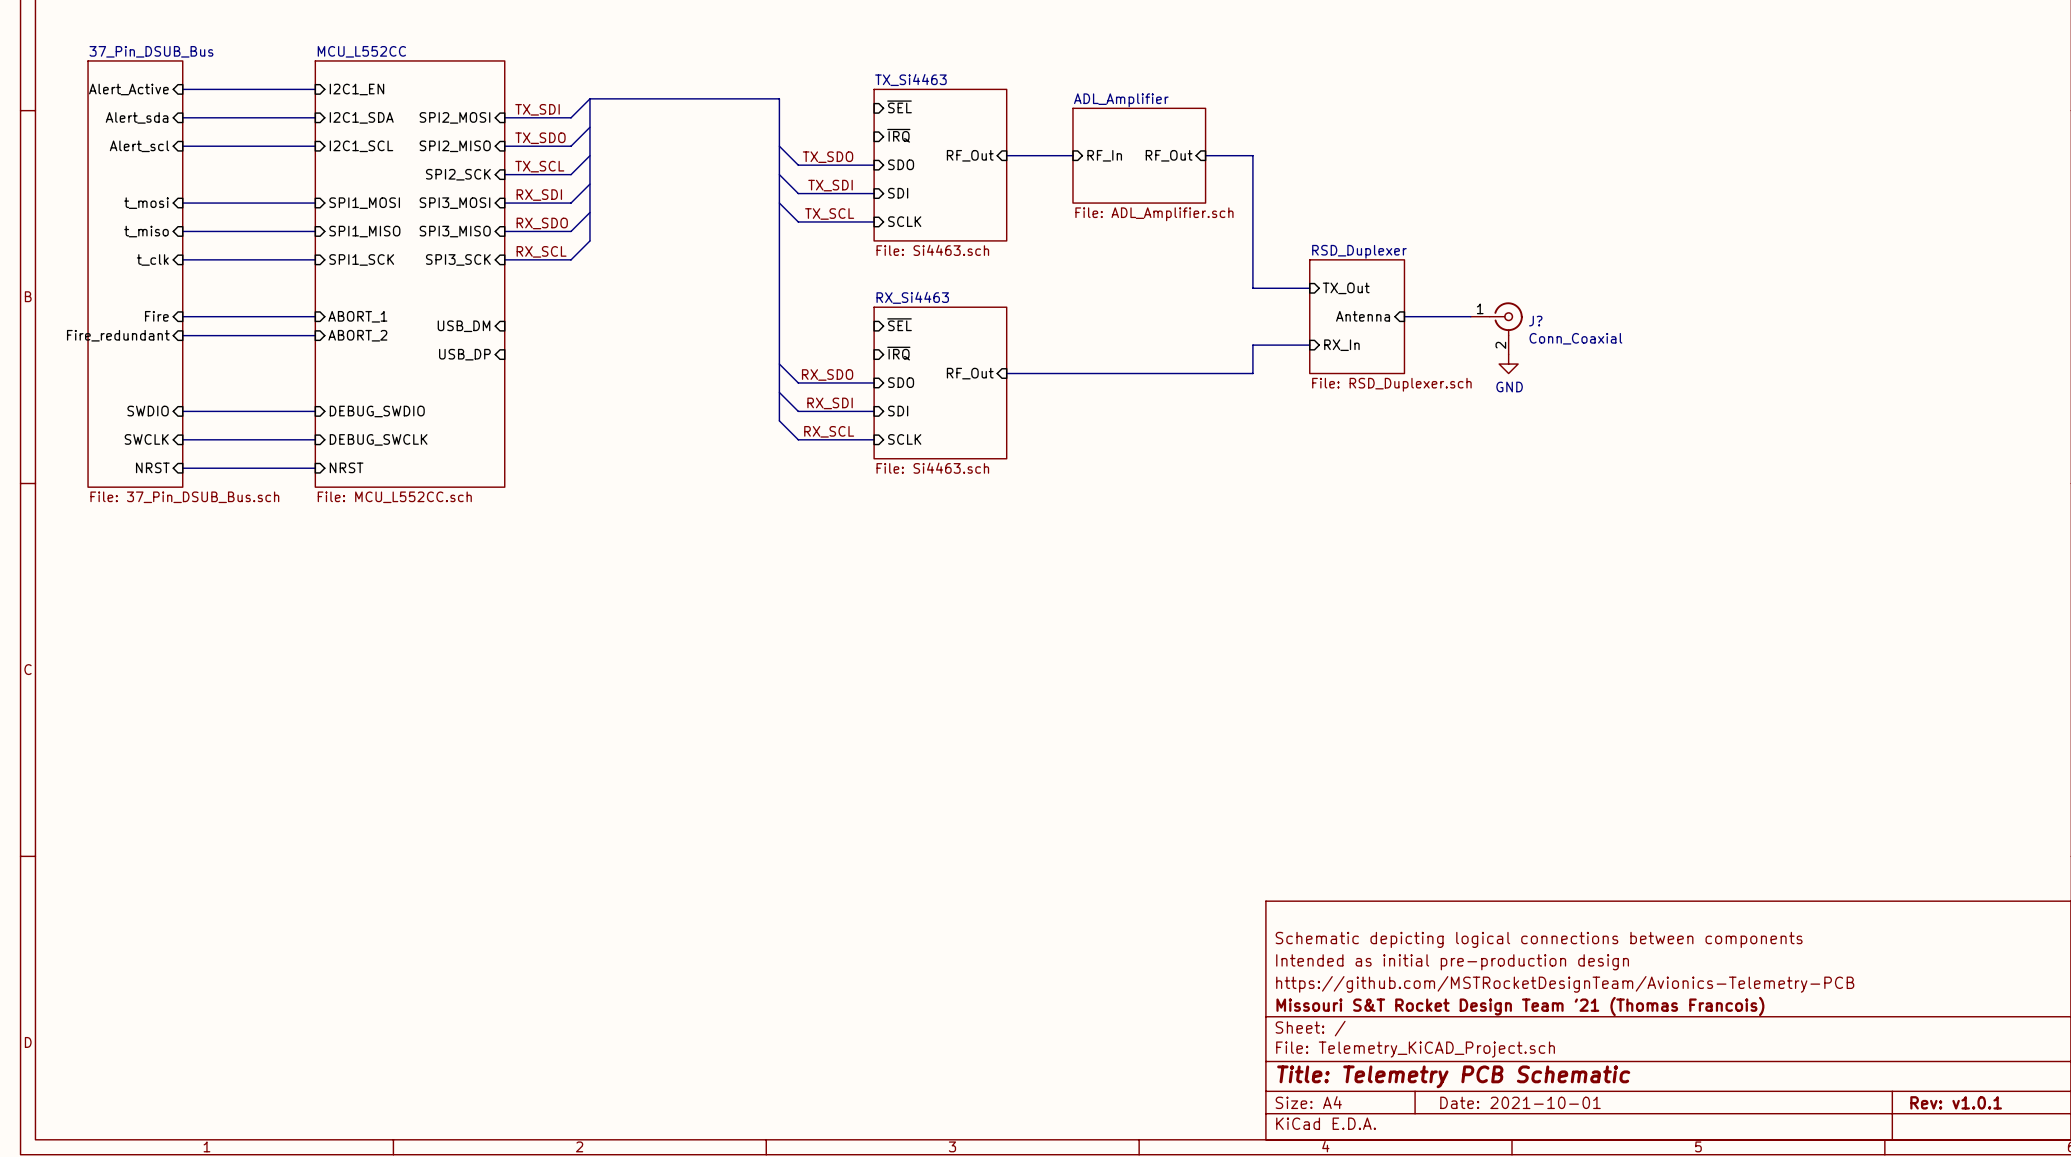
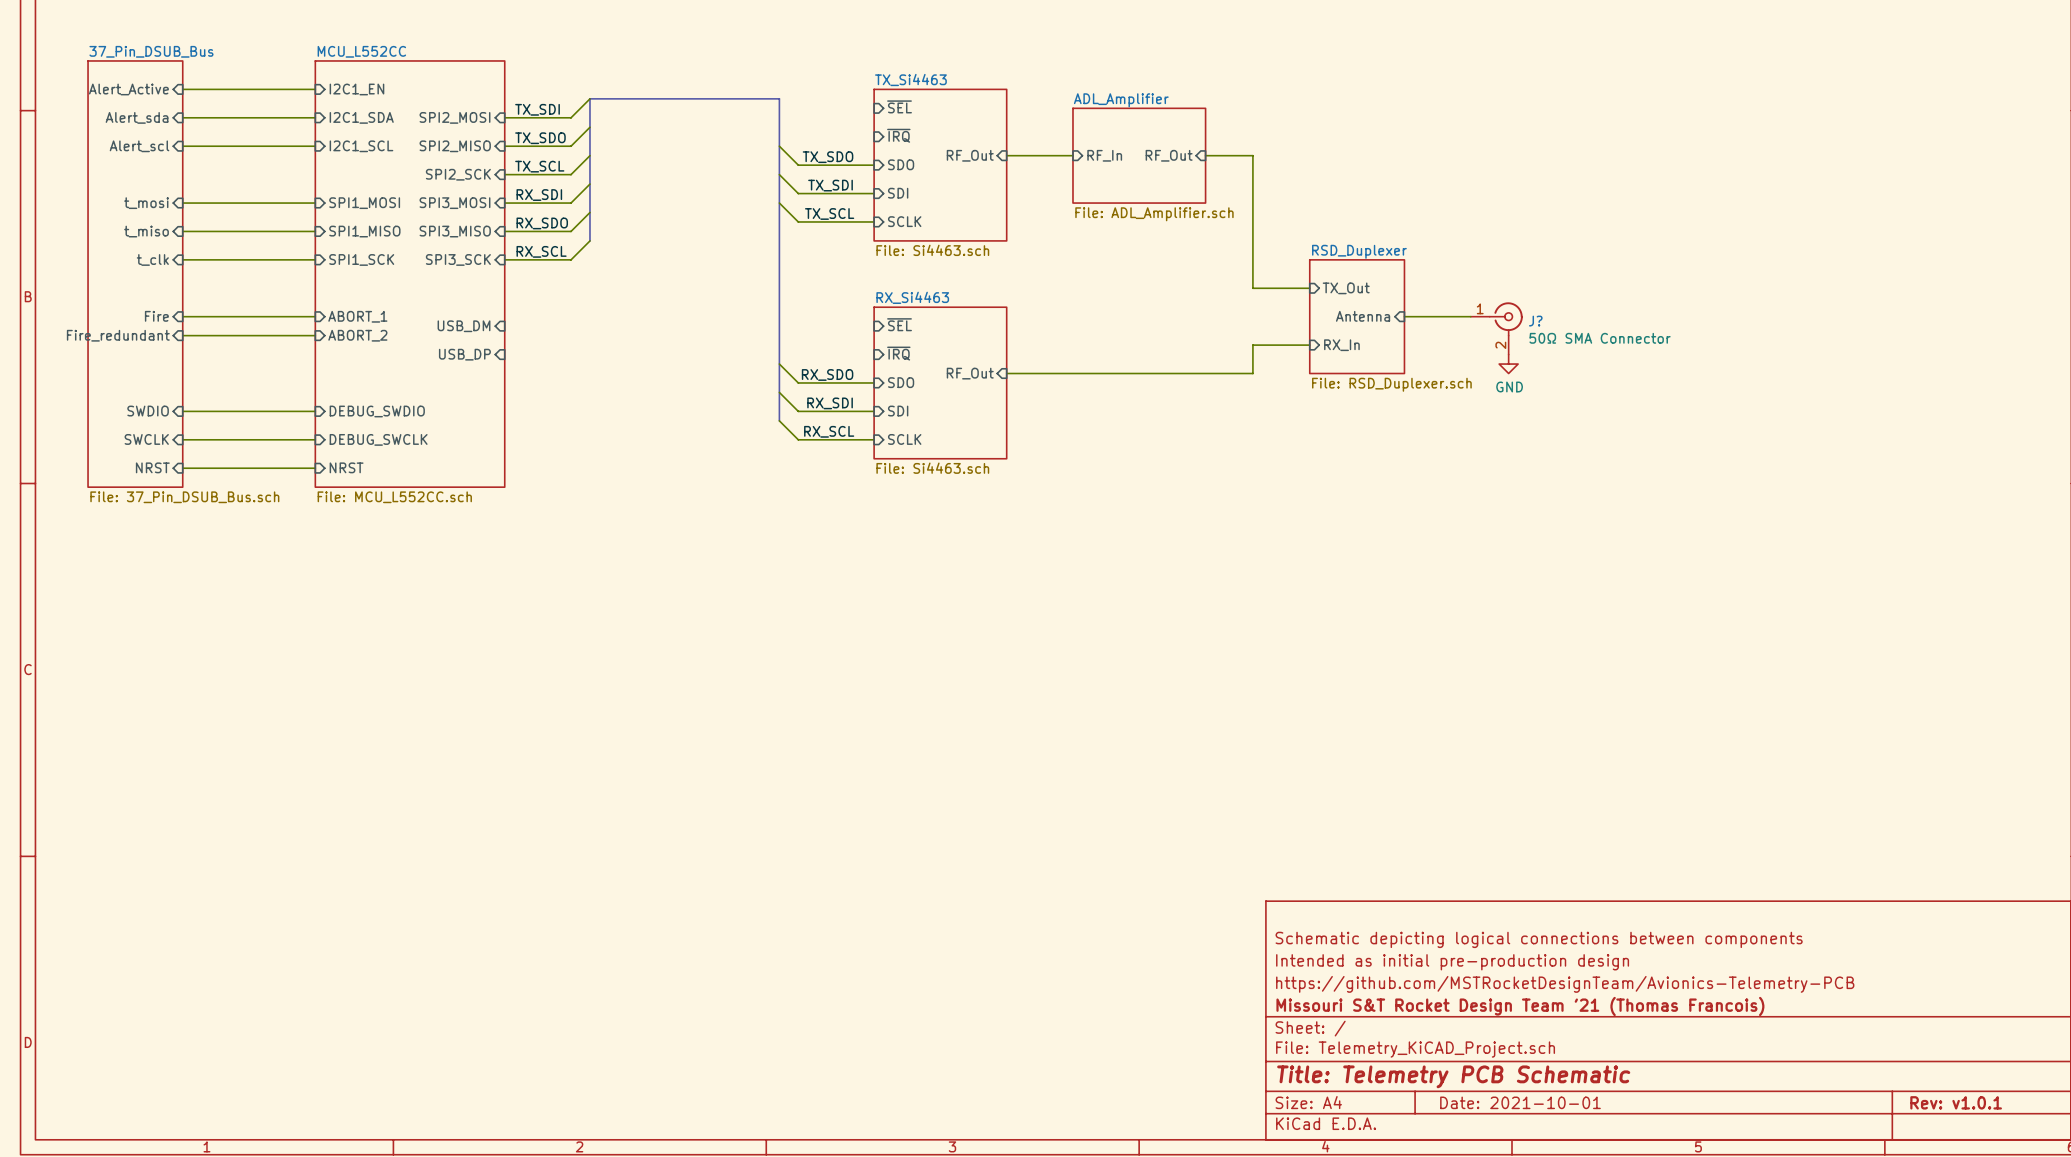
J? value: Conn_Coaxial (1575, 338) -> 50Ω SMA Connector (1600, 338)

